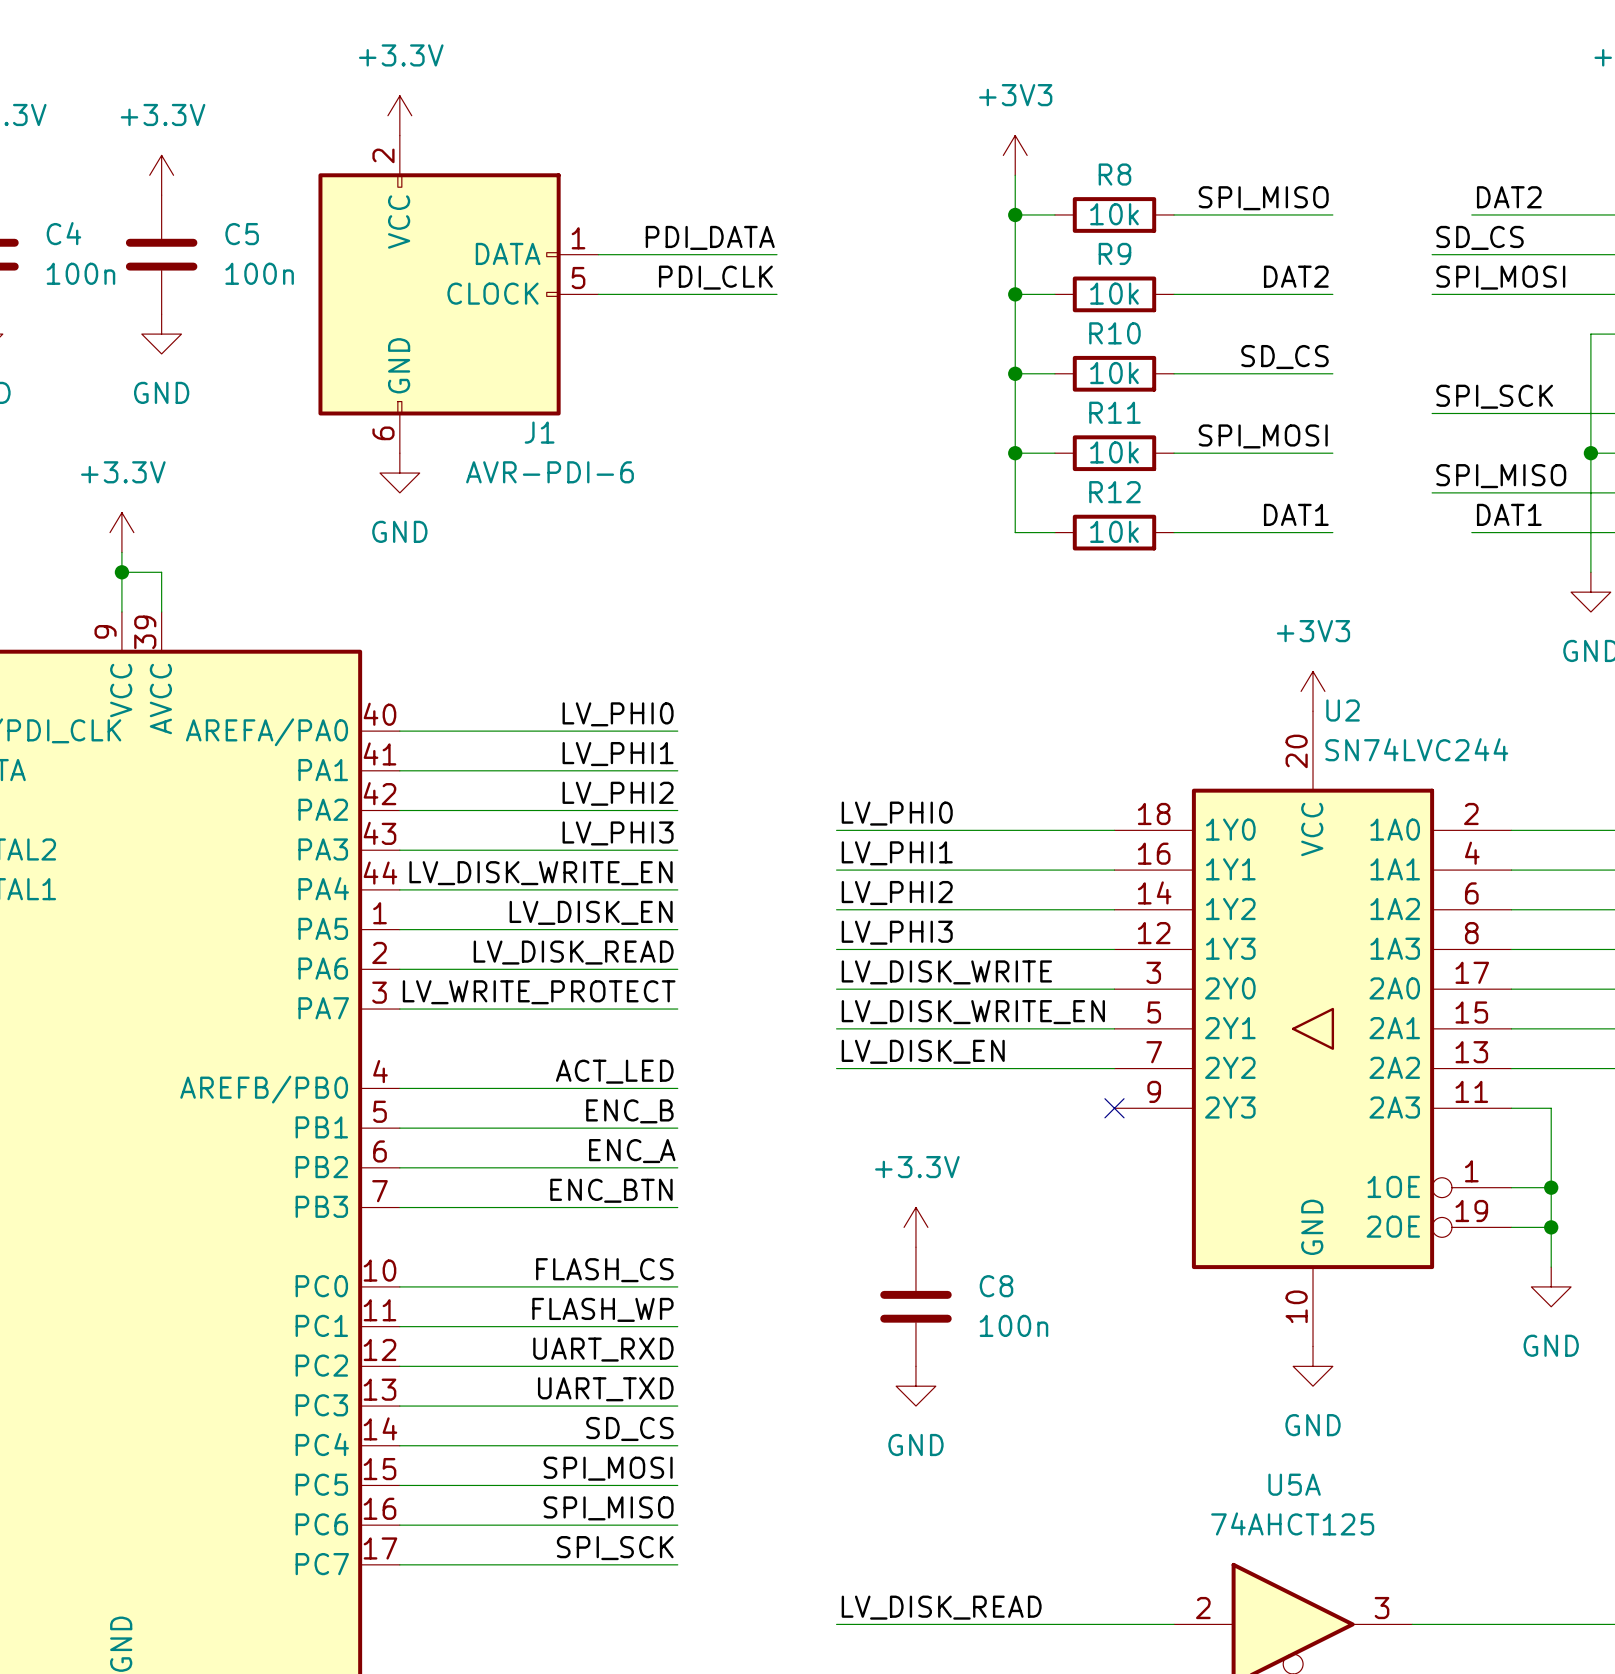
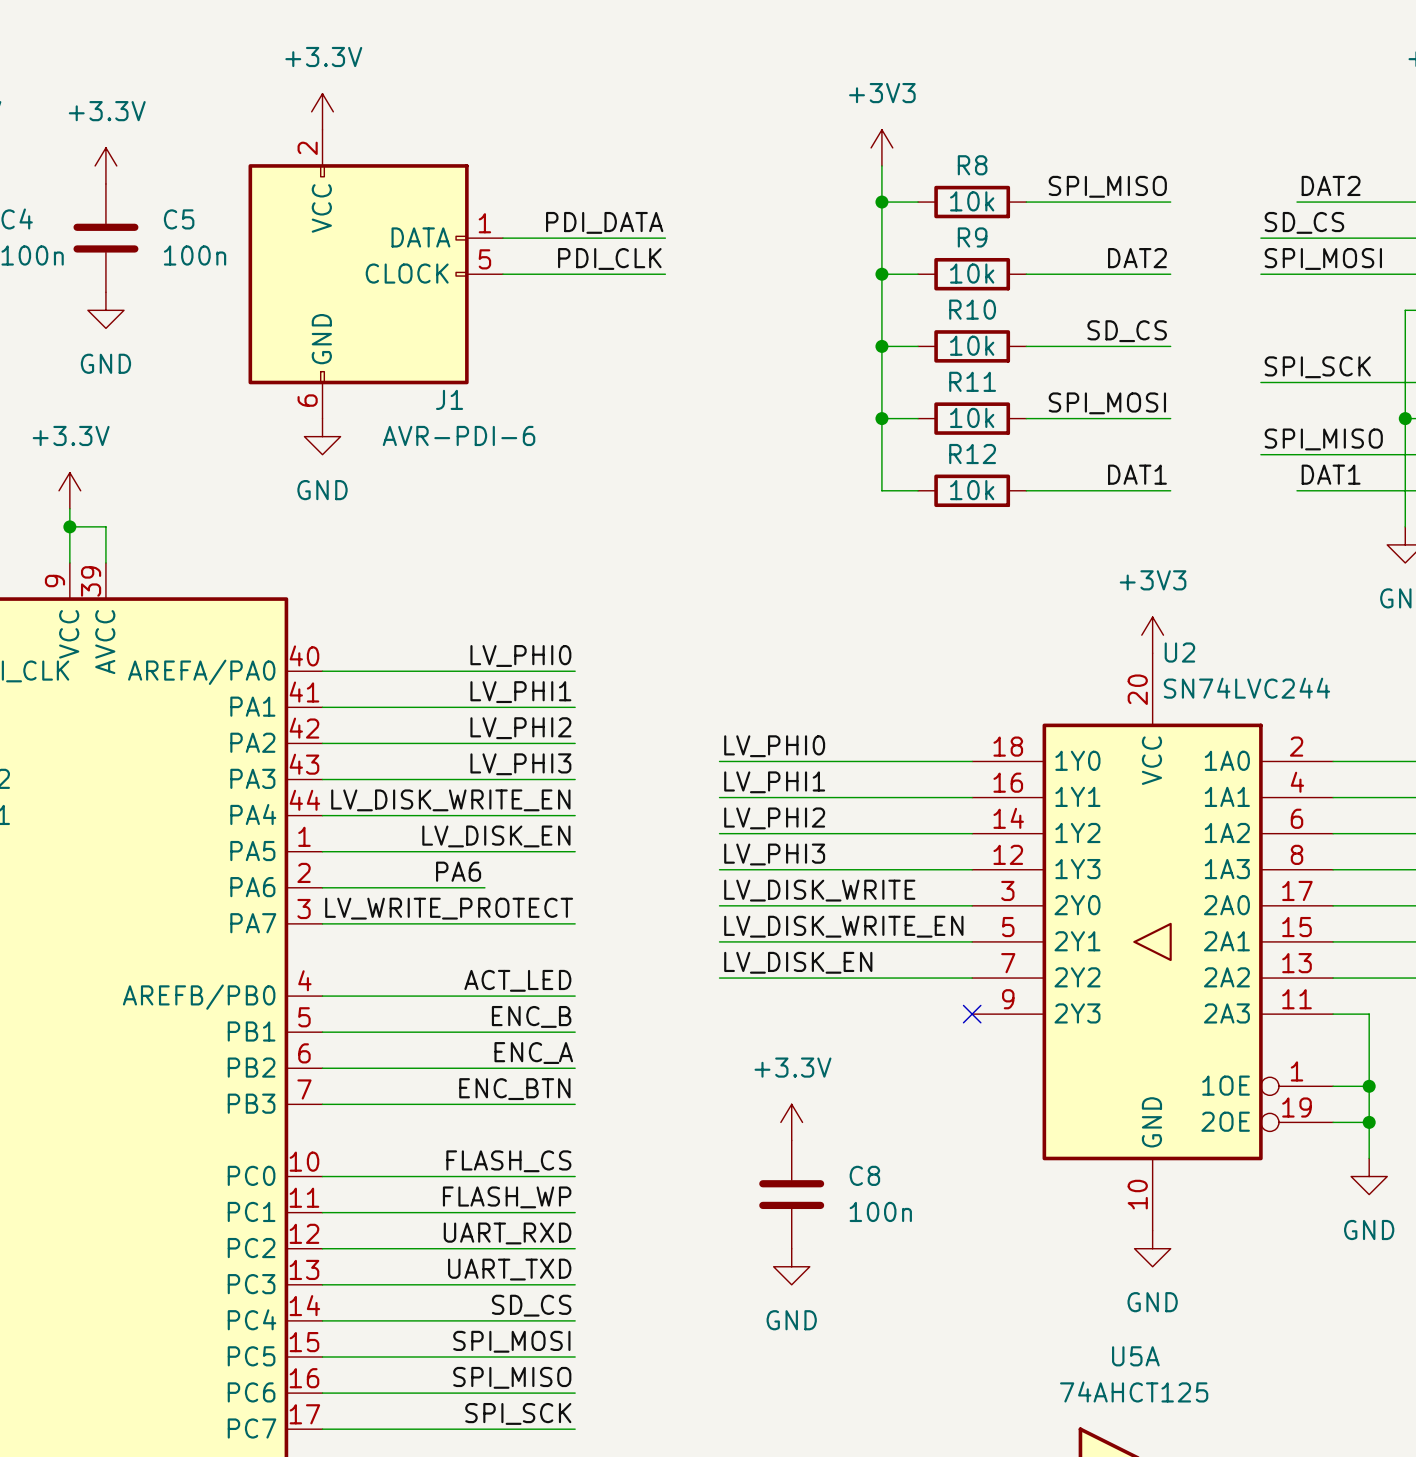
label: none -> PA6 (458, 871)
label: LV_DISK_READ (573, 952) -> none
wire: (578, 969) (677, 969) -> none

